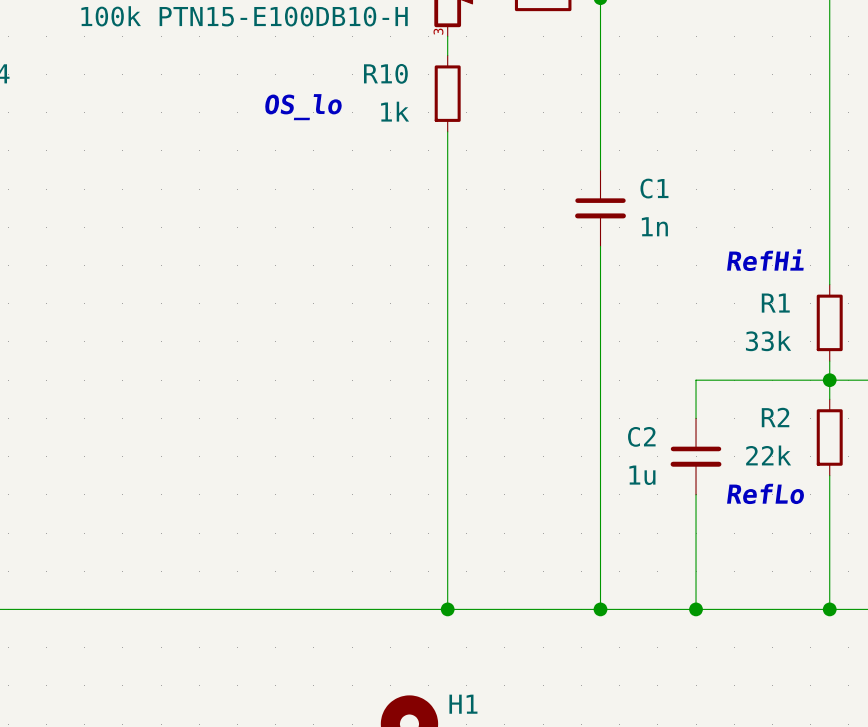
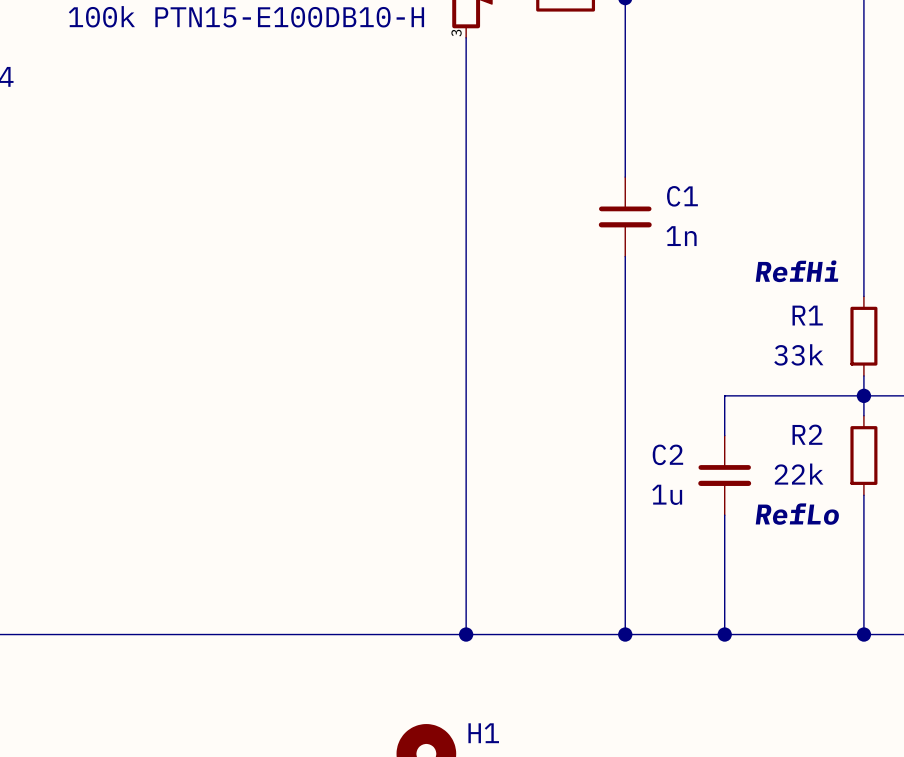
wire: none -> (466, 57) (466, 137)
R10: 1k (447, 93) -> none
text: OS_lo (303, 107) -> none

